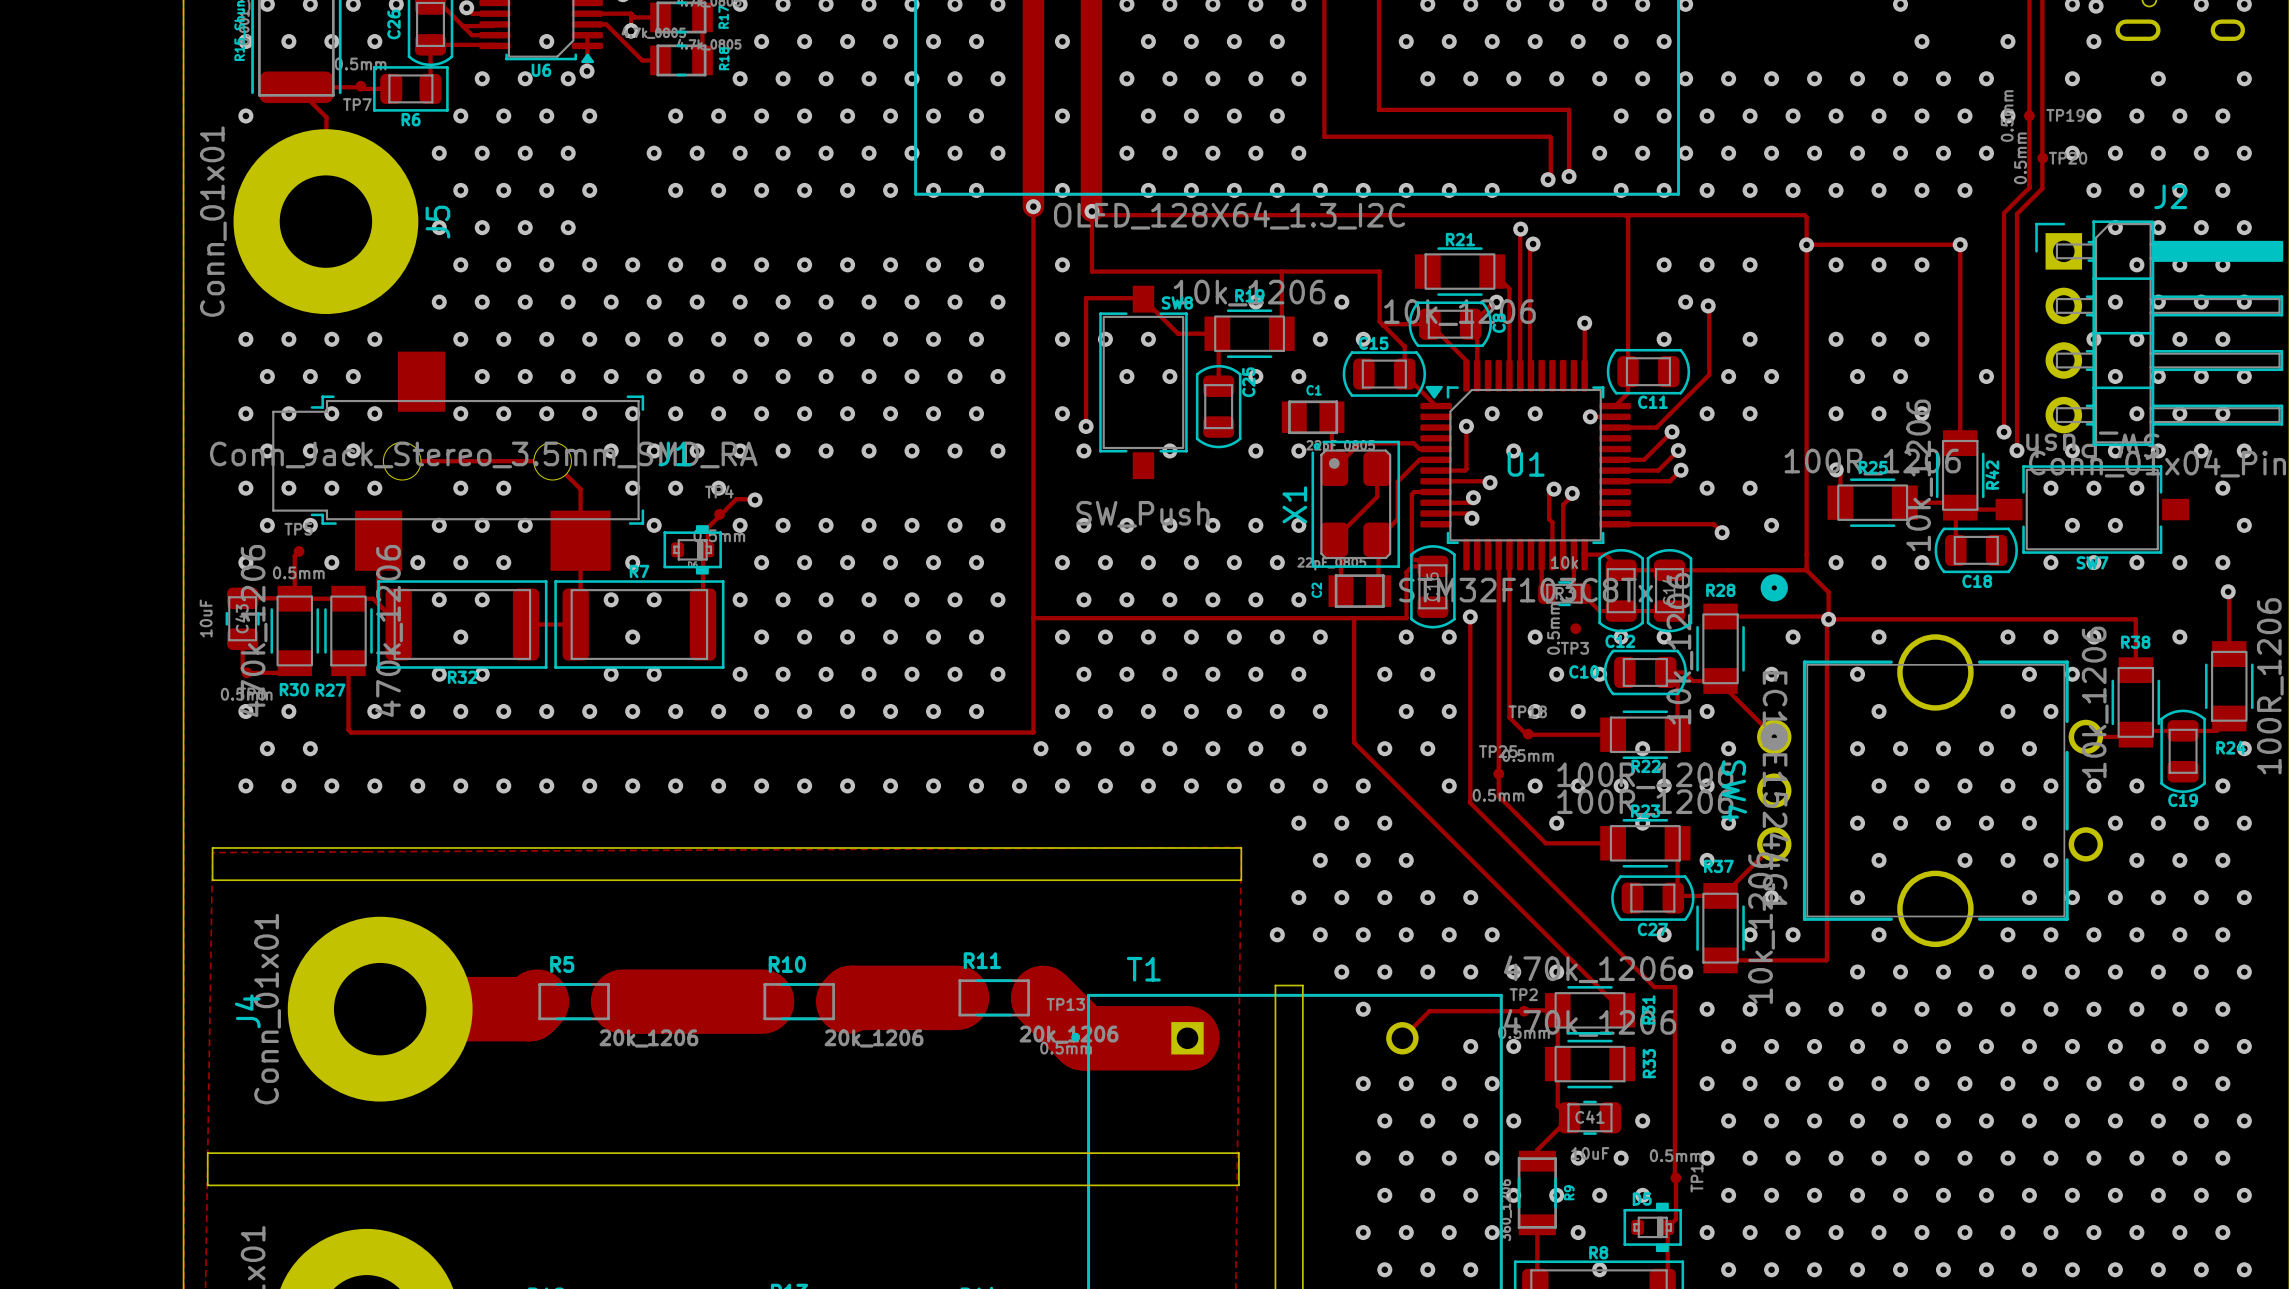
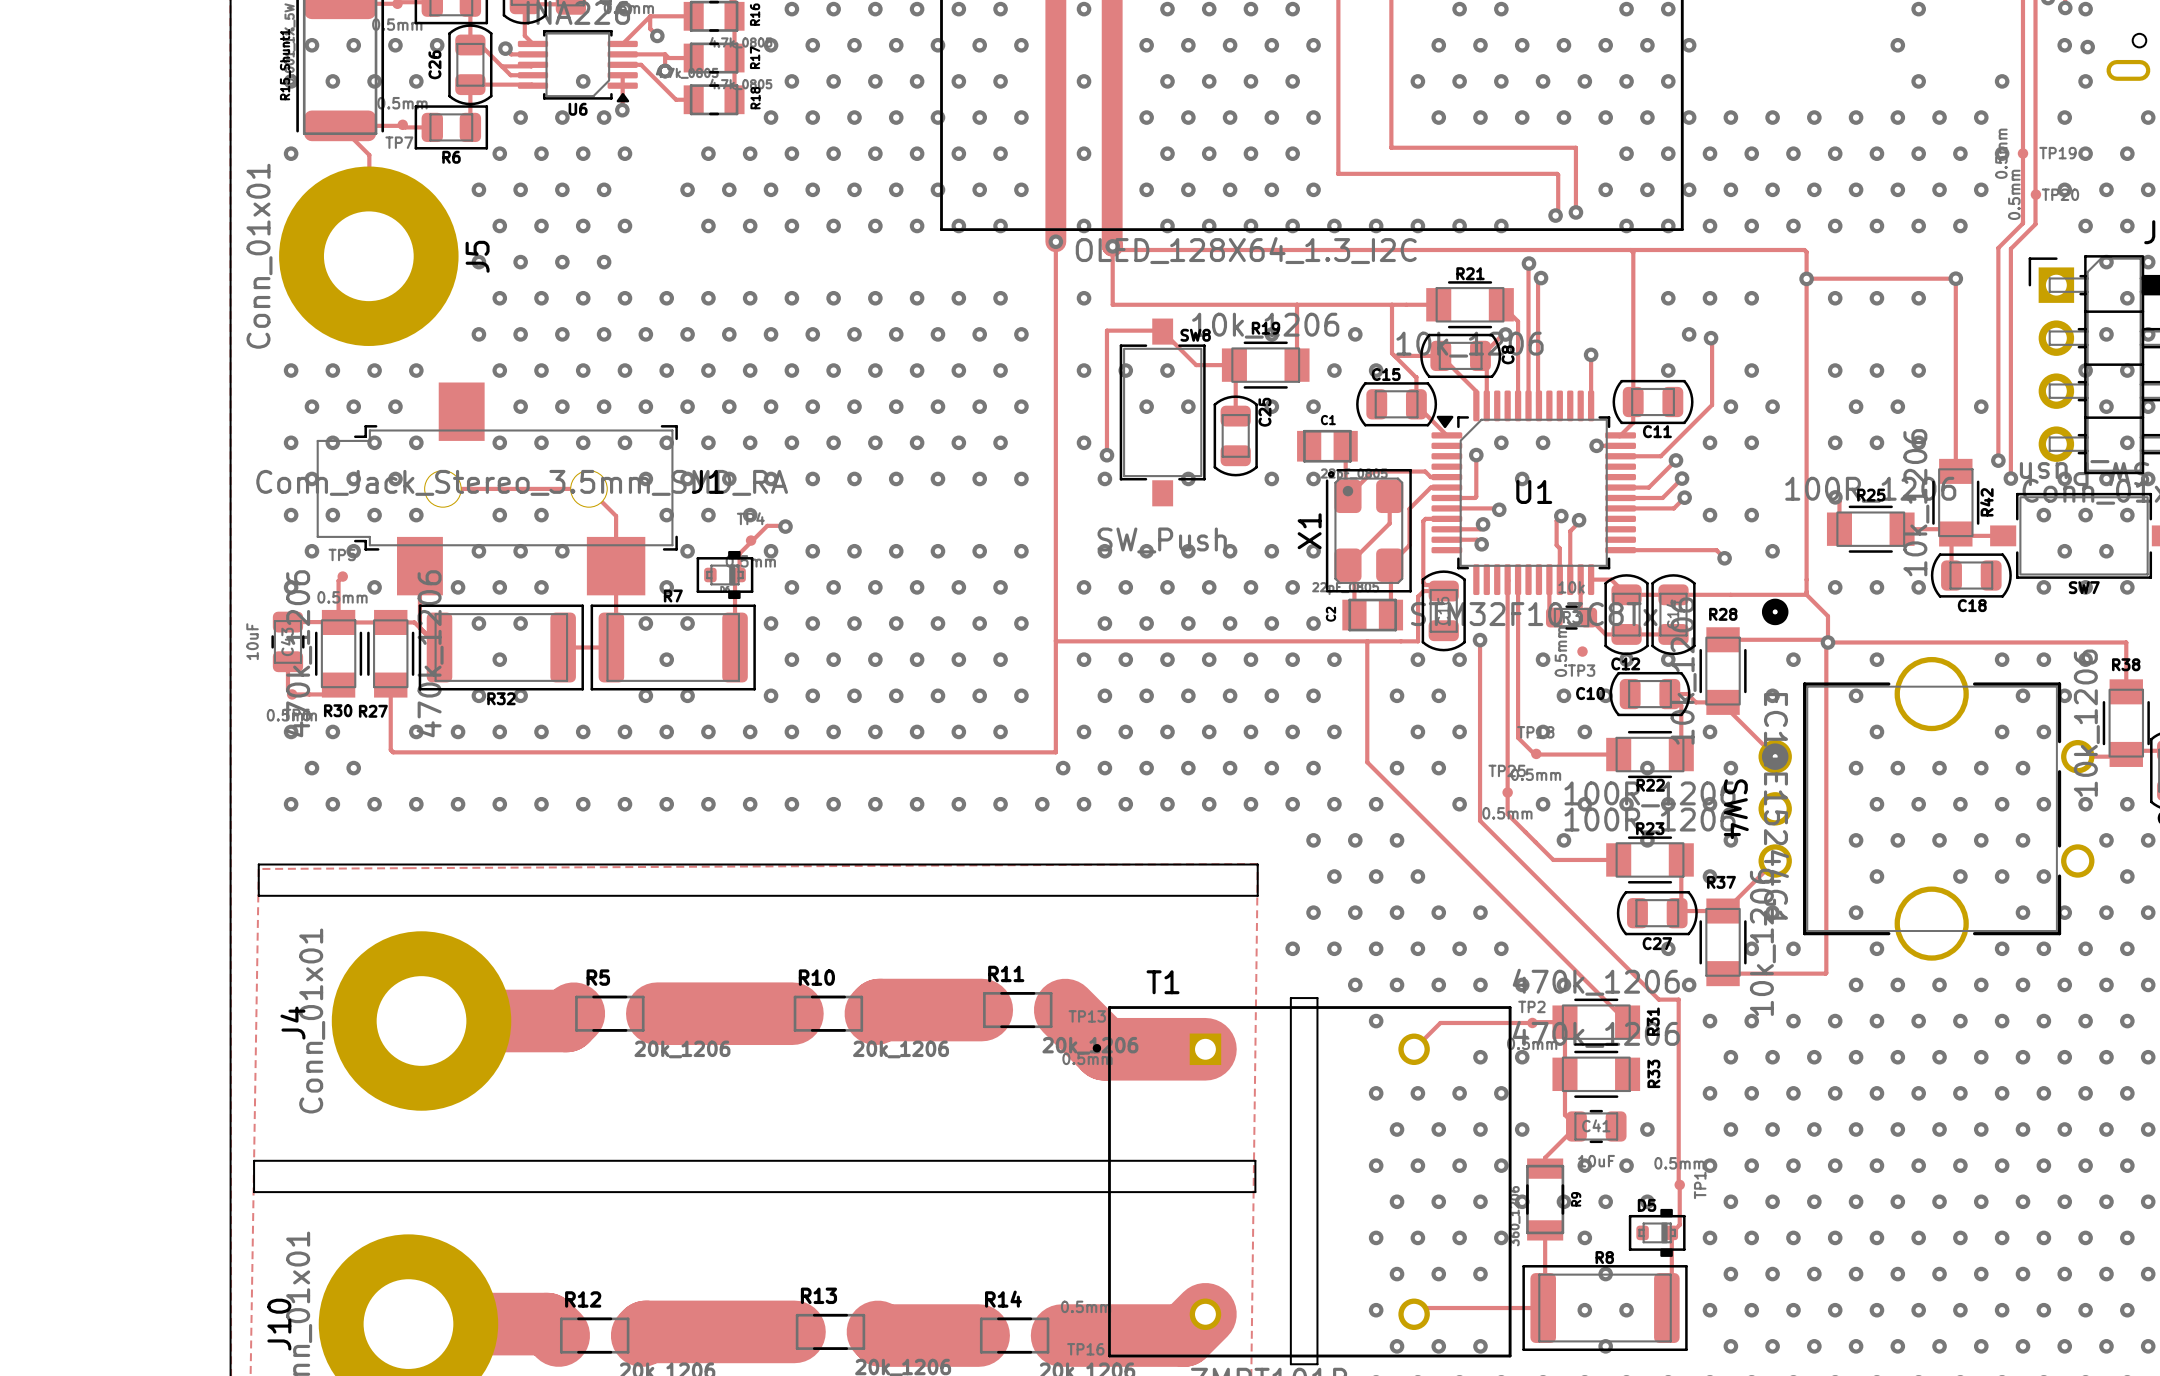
track: none -> (1392, 304) (1438, 304)

